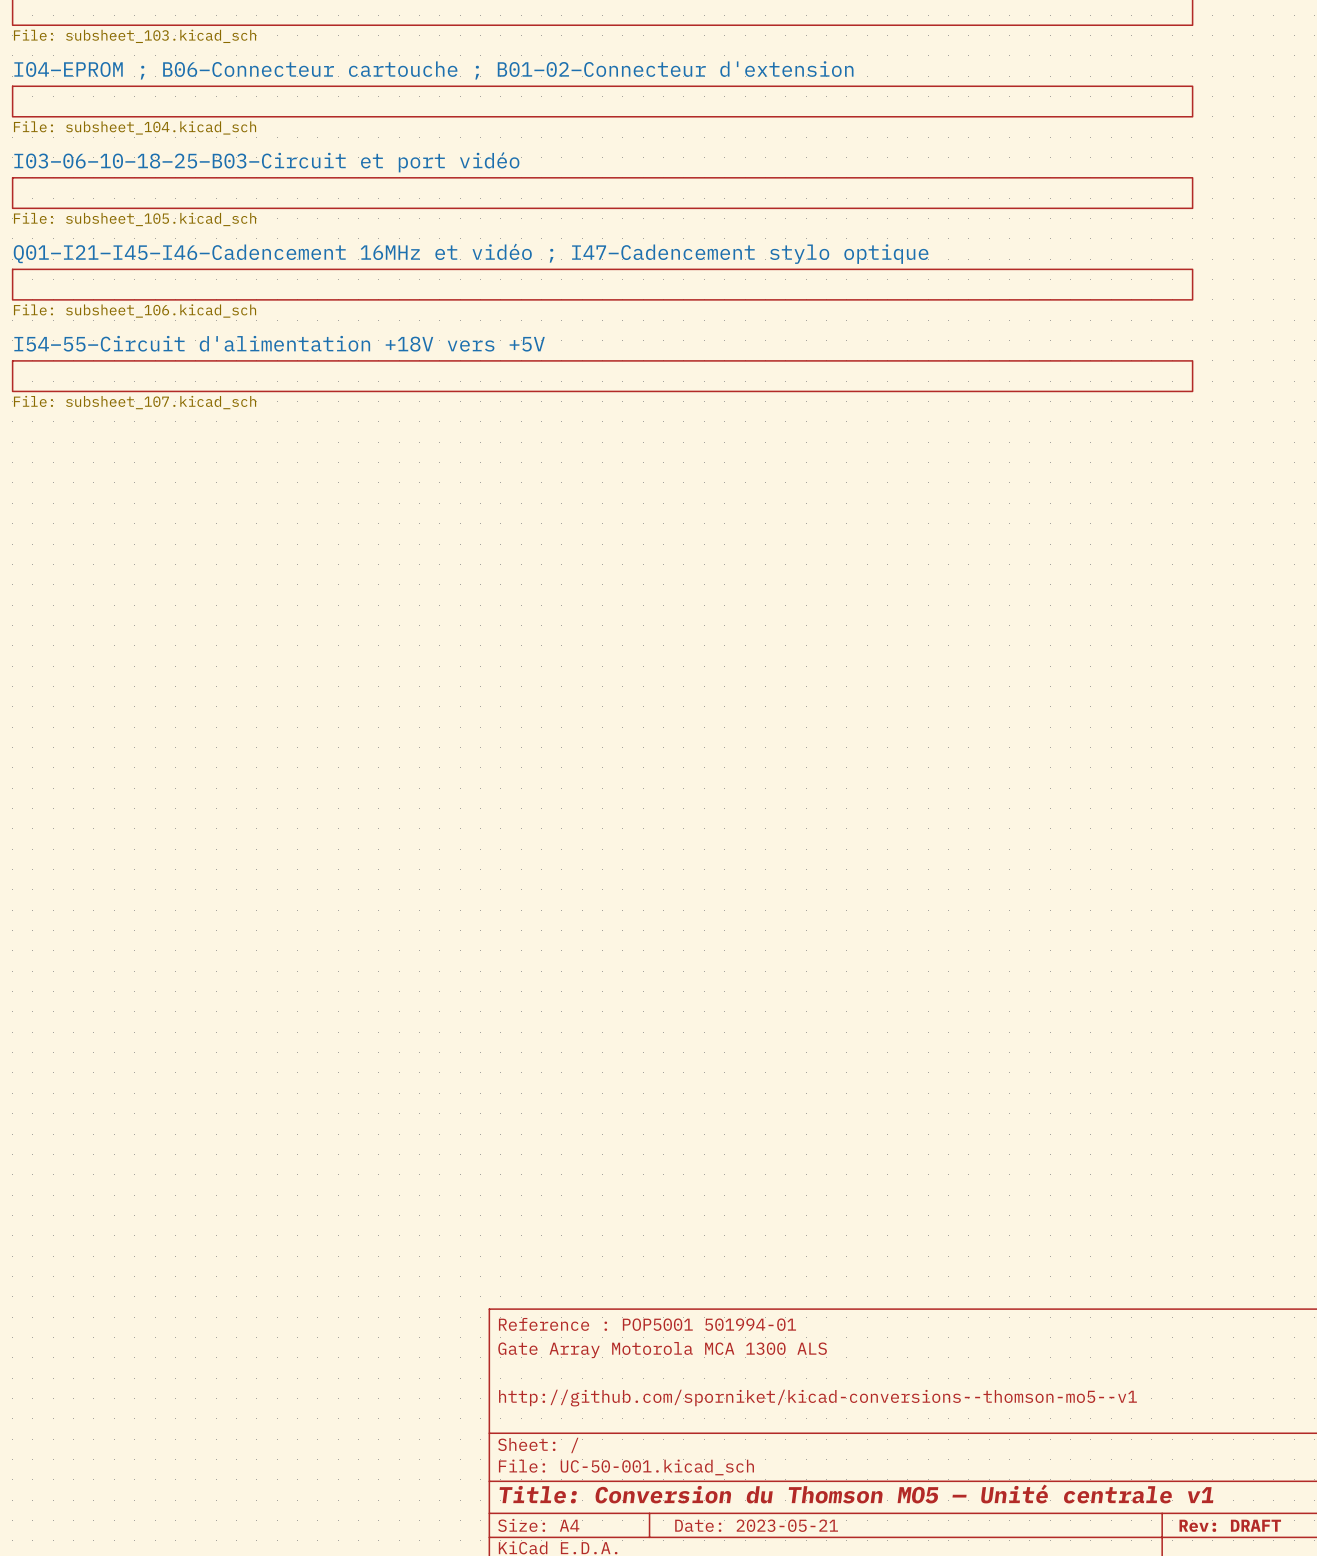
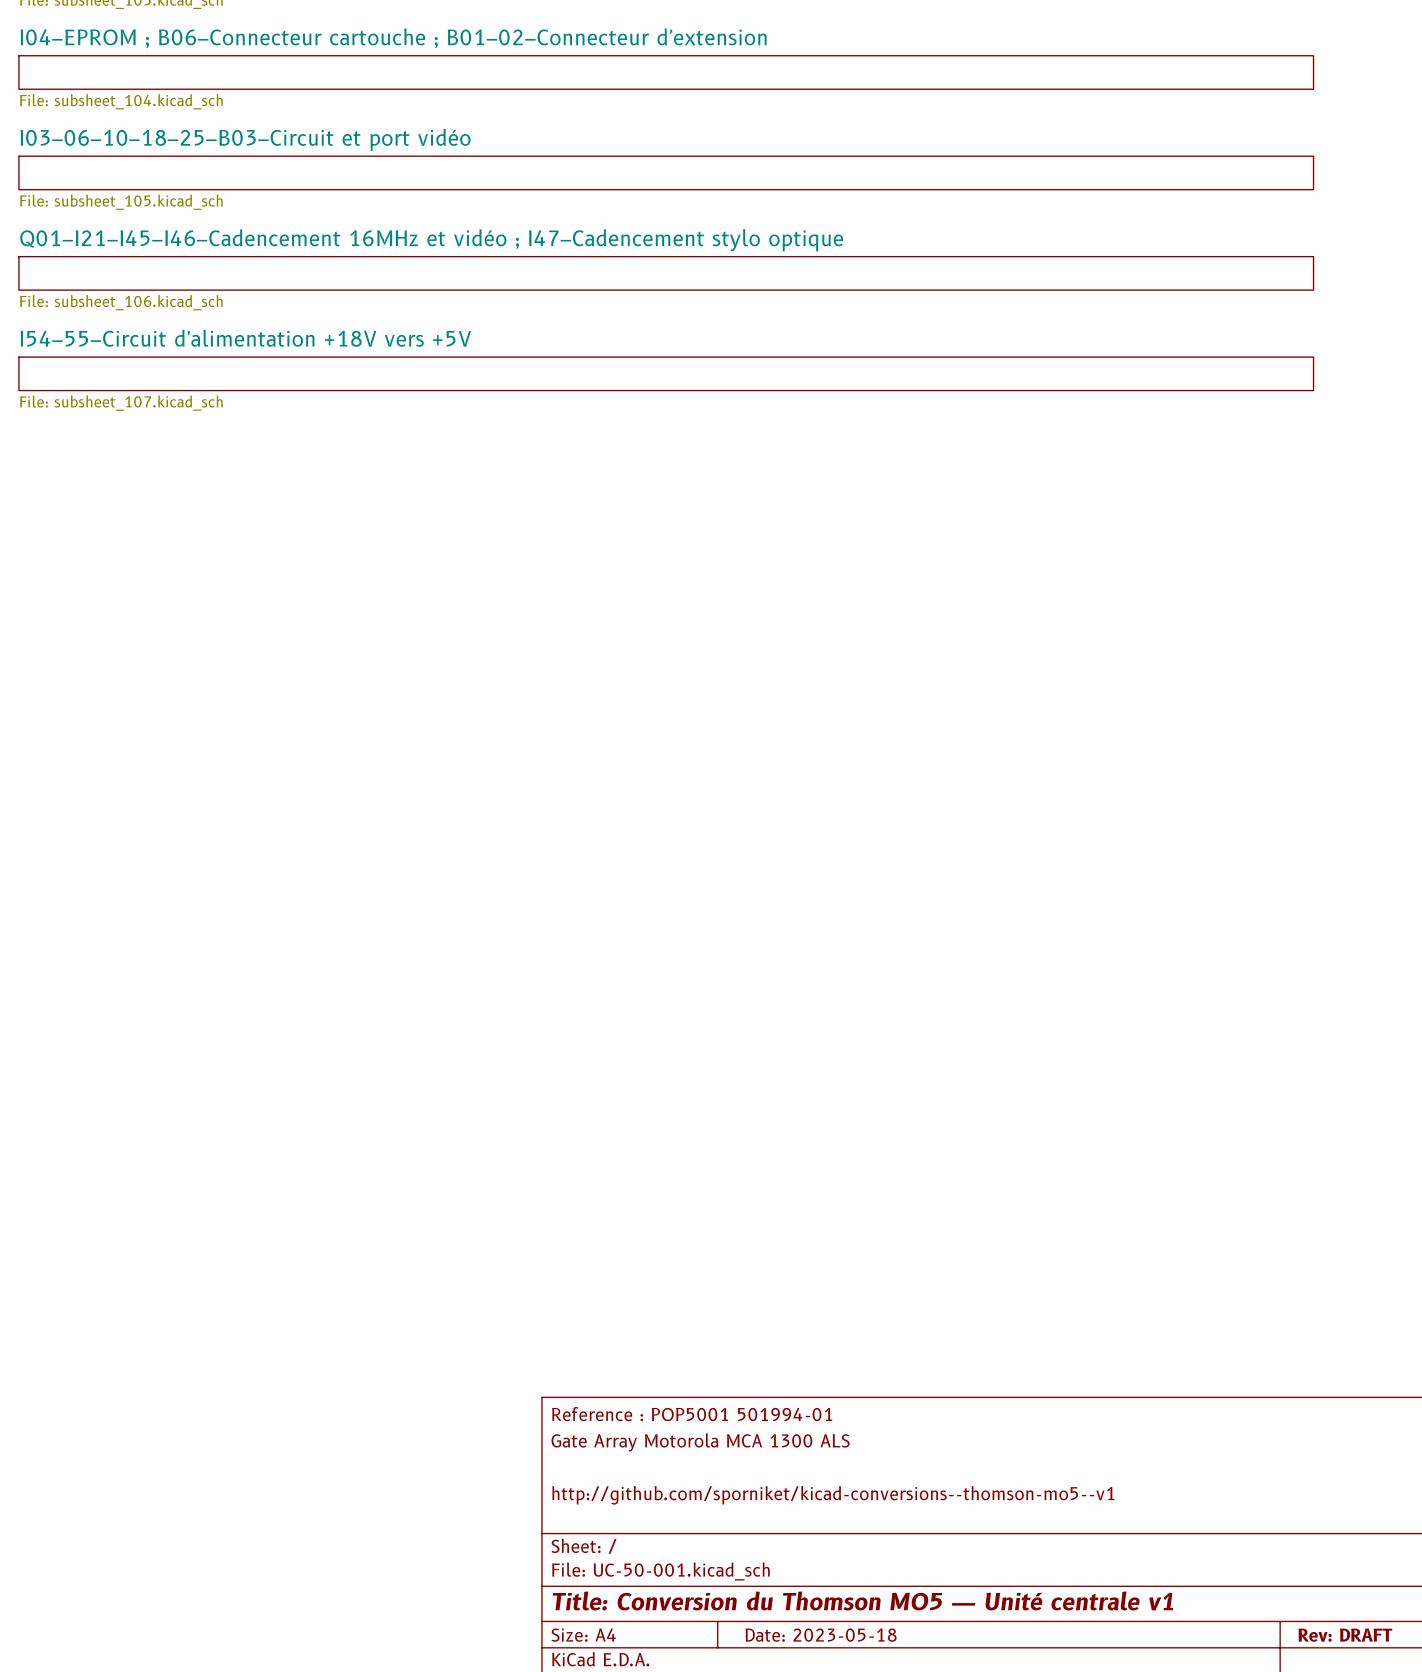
title block: Date: 2023-05-21 (756, 1525) -> Date: 2023-05-18 (821, 1635)

